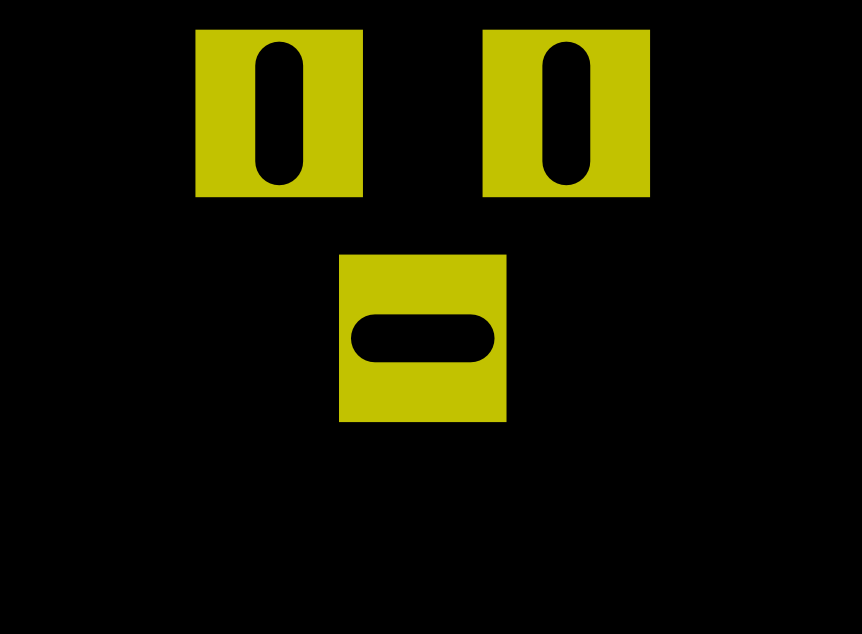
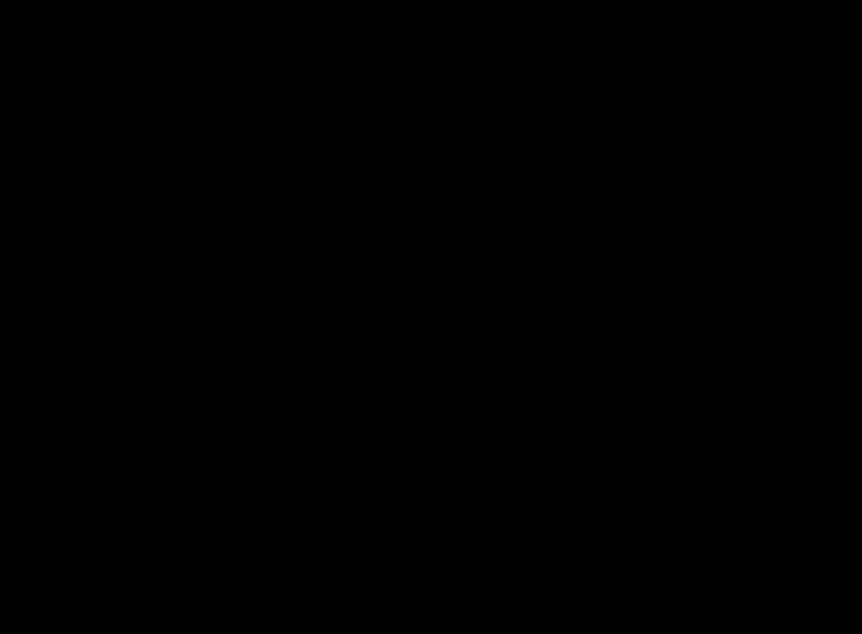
part: (422, 225) -> none

